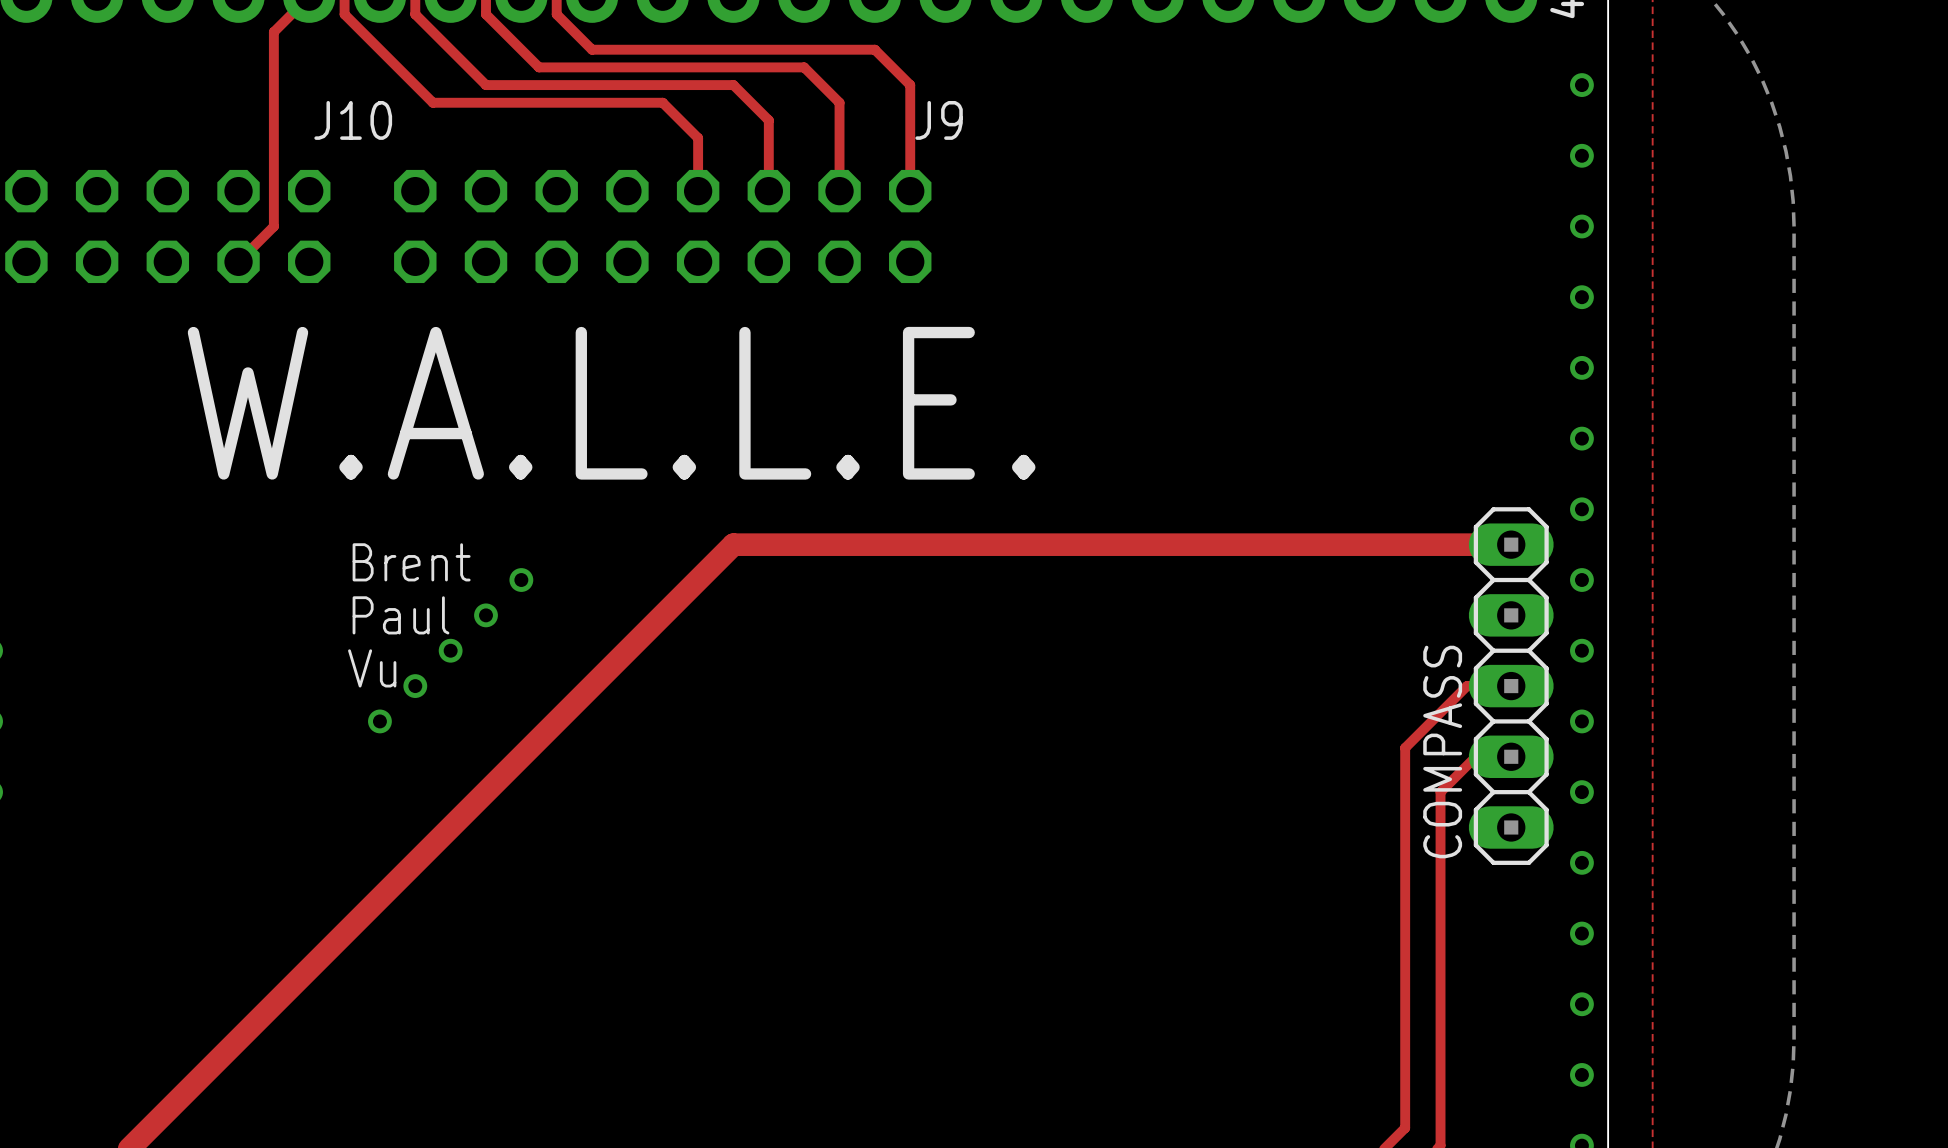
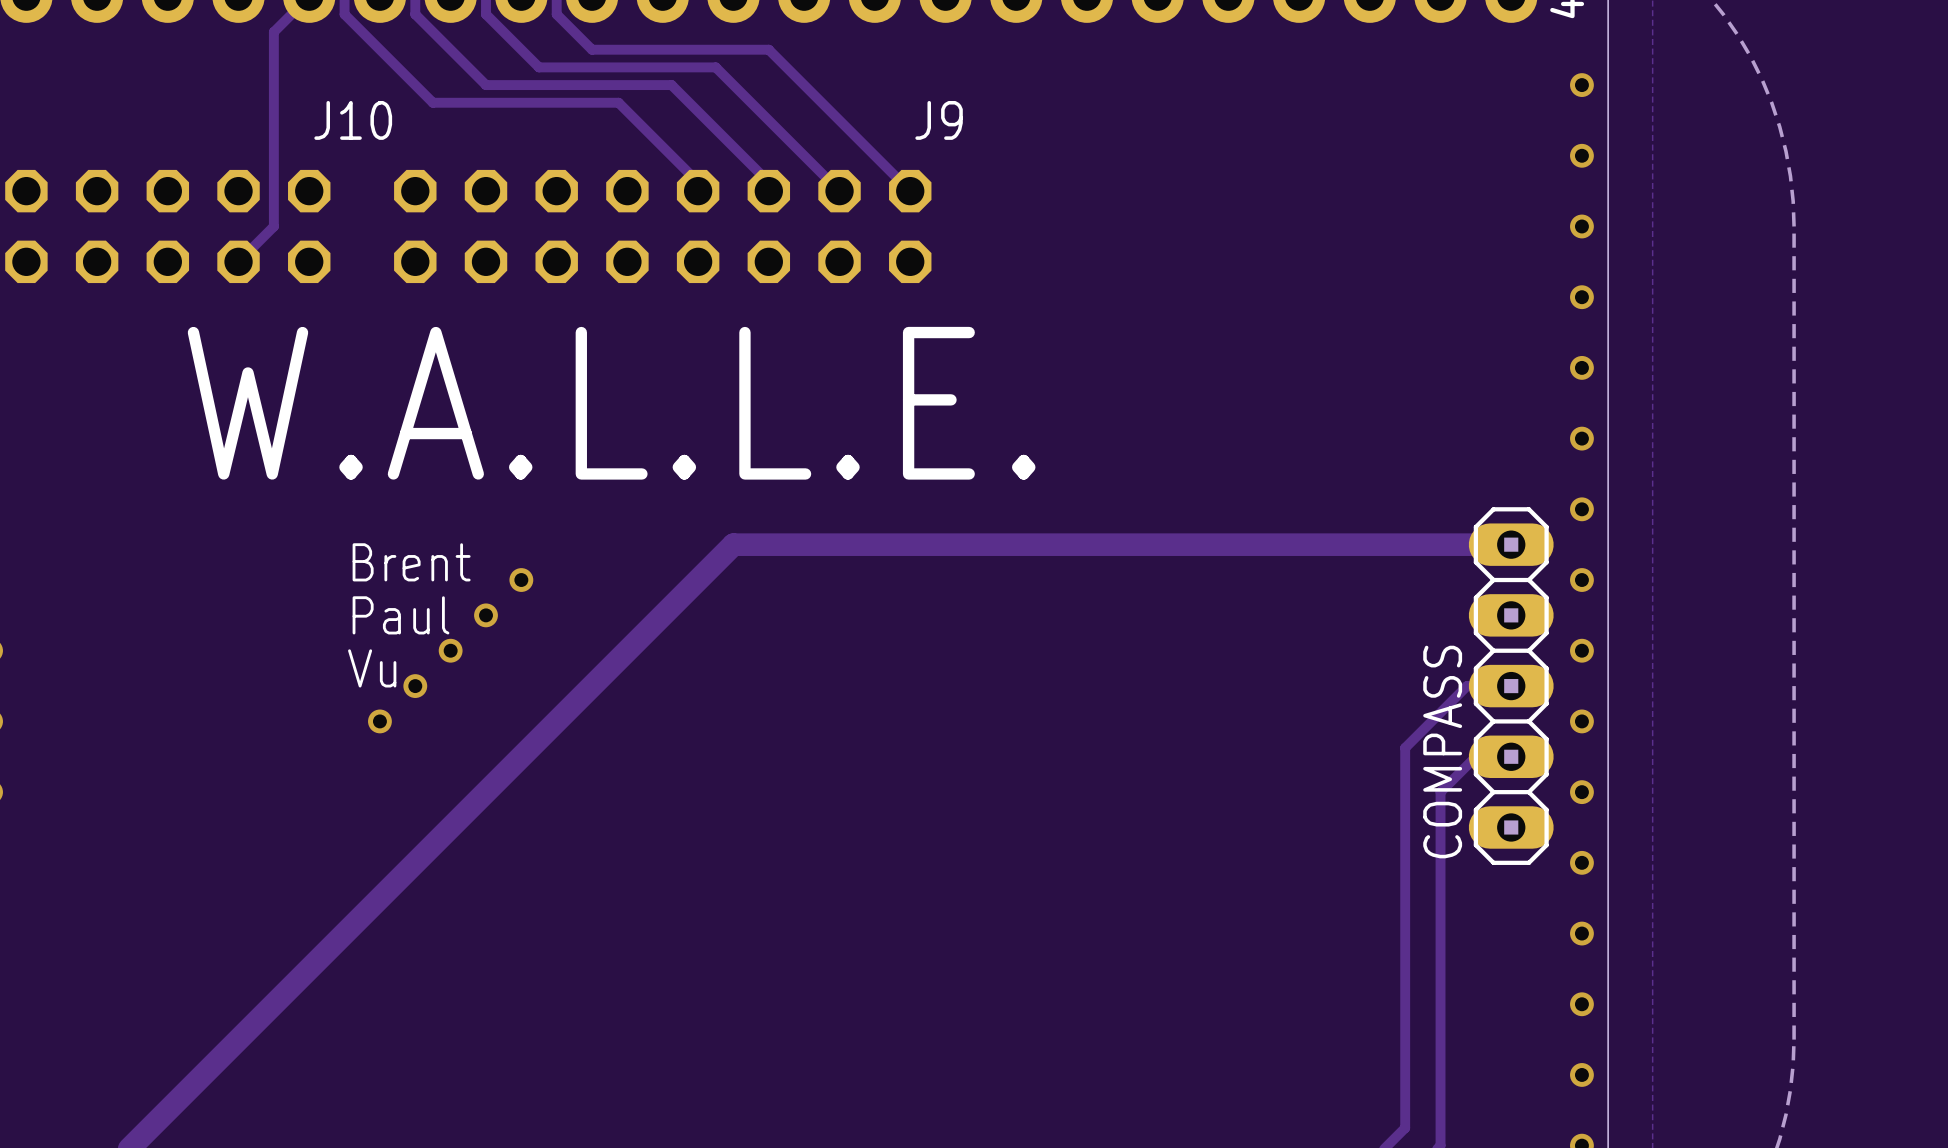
track: (768, 49) (874, 49) (910, 85) (910, 191) -> (768, 49) (910, 191)
track: (715, 67) (804, 67) (839, 102) (839, 191) -> none
track: (671, 85) (733, 85) -> (715, 67) (733, 85)
track: none -> (671, 85) (768, 182)
track: (618, 102) (662, 102) (698, 138) (698, 182) -> (618, 102) (698, 182)
track: (768, 120) (768, 182) -> (768, 120) (839, 191)

